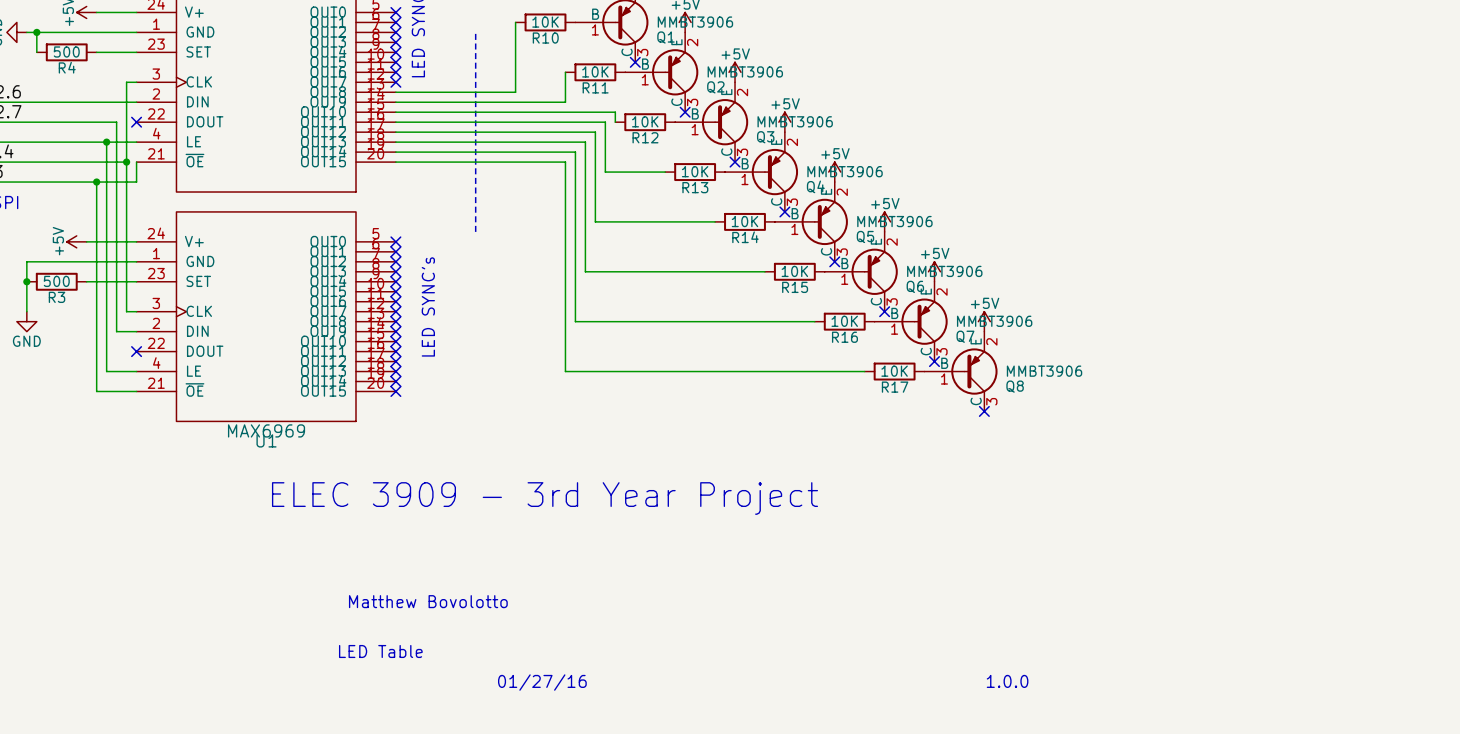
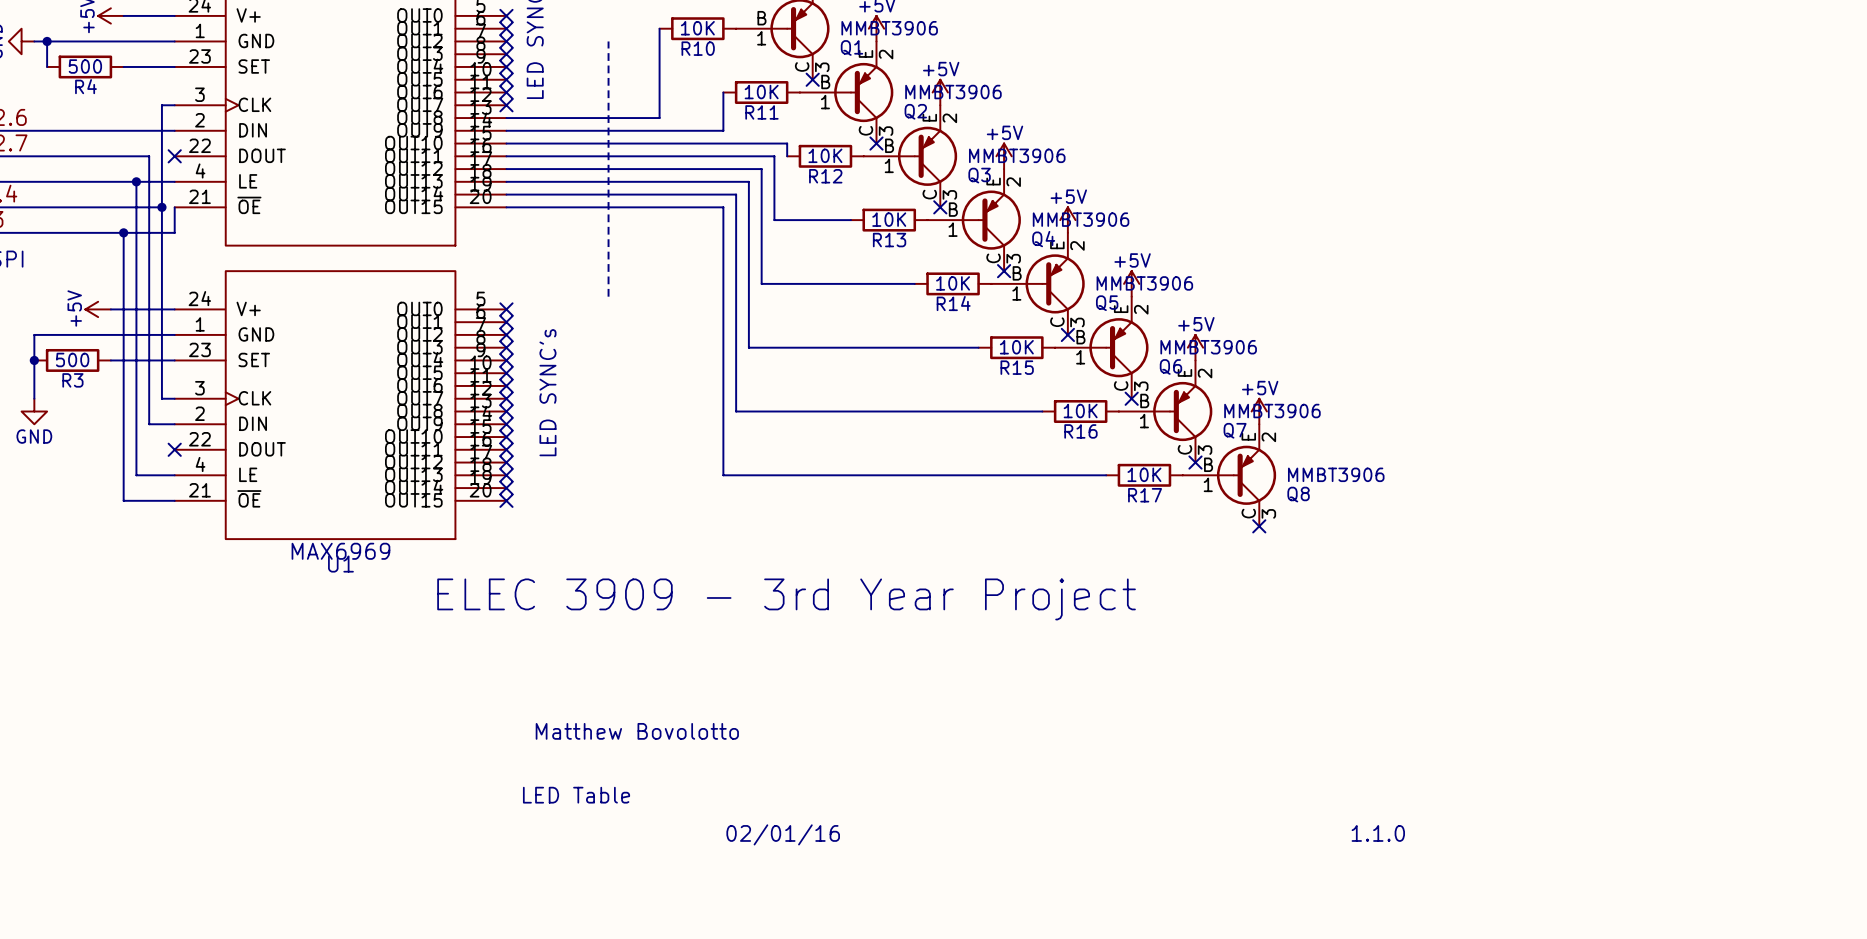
text position: ELEC 3909 - 3rd Year Project (545, 498) -> ELEC 3909 - 3rd Year Project (786, 599)
text position: Matthew Bovolotto (428, 601) -> Matthew Bovolotto (637, 731)
text position: LED Table (380, 651) -> LED Table (576, 795)
text: none -> 1.1.0 (1378, 833)
text: none -> 02/01/16 (783, 834)
text: 1.0.0 (1007, 681) -> none
text: 01/27/16 (542, 682) -> none

